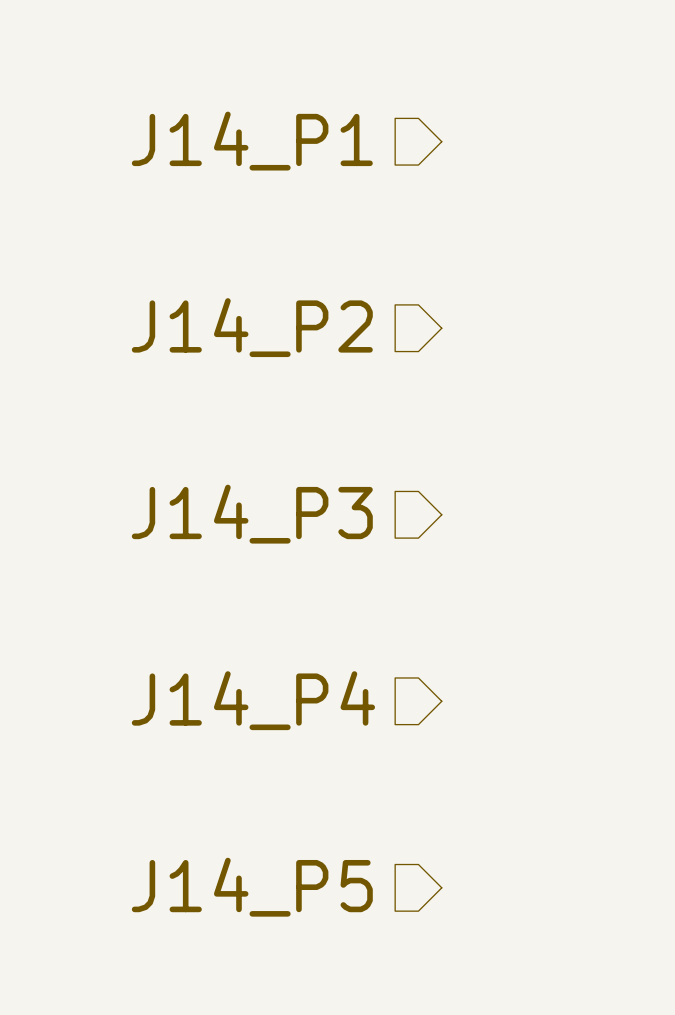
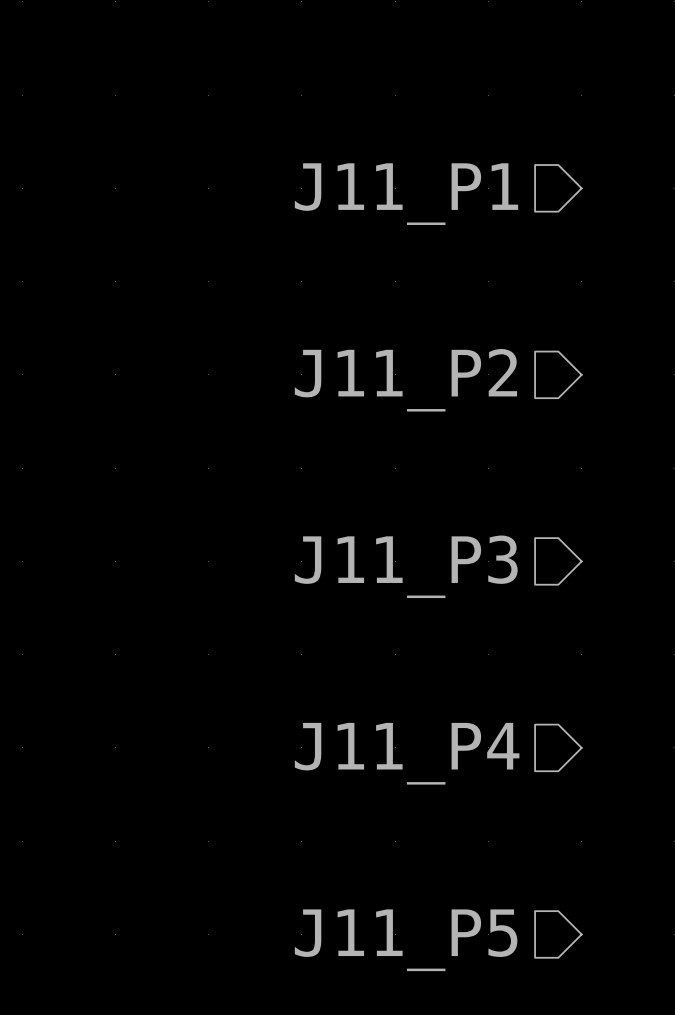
hierarchical label: J14_P1 (252, 141) -> J11_P1 (406, 194)
hierarchical label: J14_P2 (252, 327) -> J11_P2 (405, 380)
hierarchical label: J14_P3 (252, 514) -> J11_P3 (406, 566)
hierarchical label: J14_P4 (253, 700) -> J11_P4 (407, 753)
hierarchical label: J14_P5 (252, 887) -> J11_P5 (406, 940)

